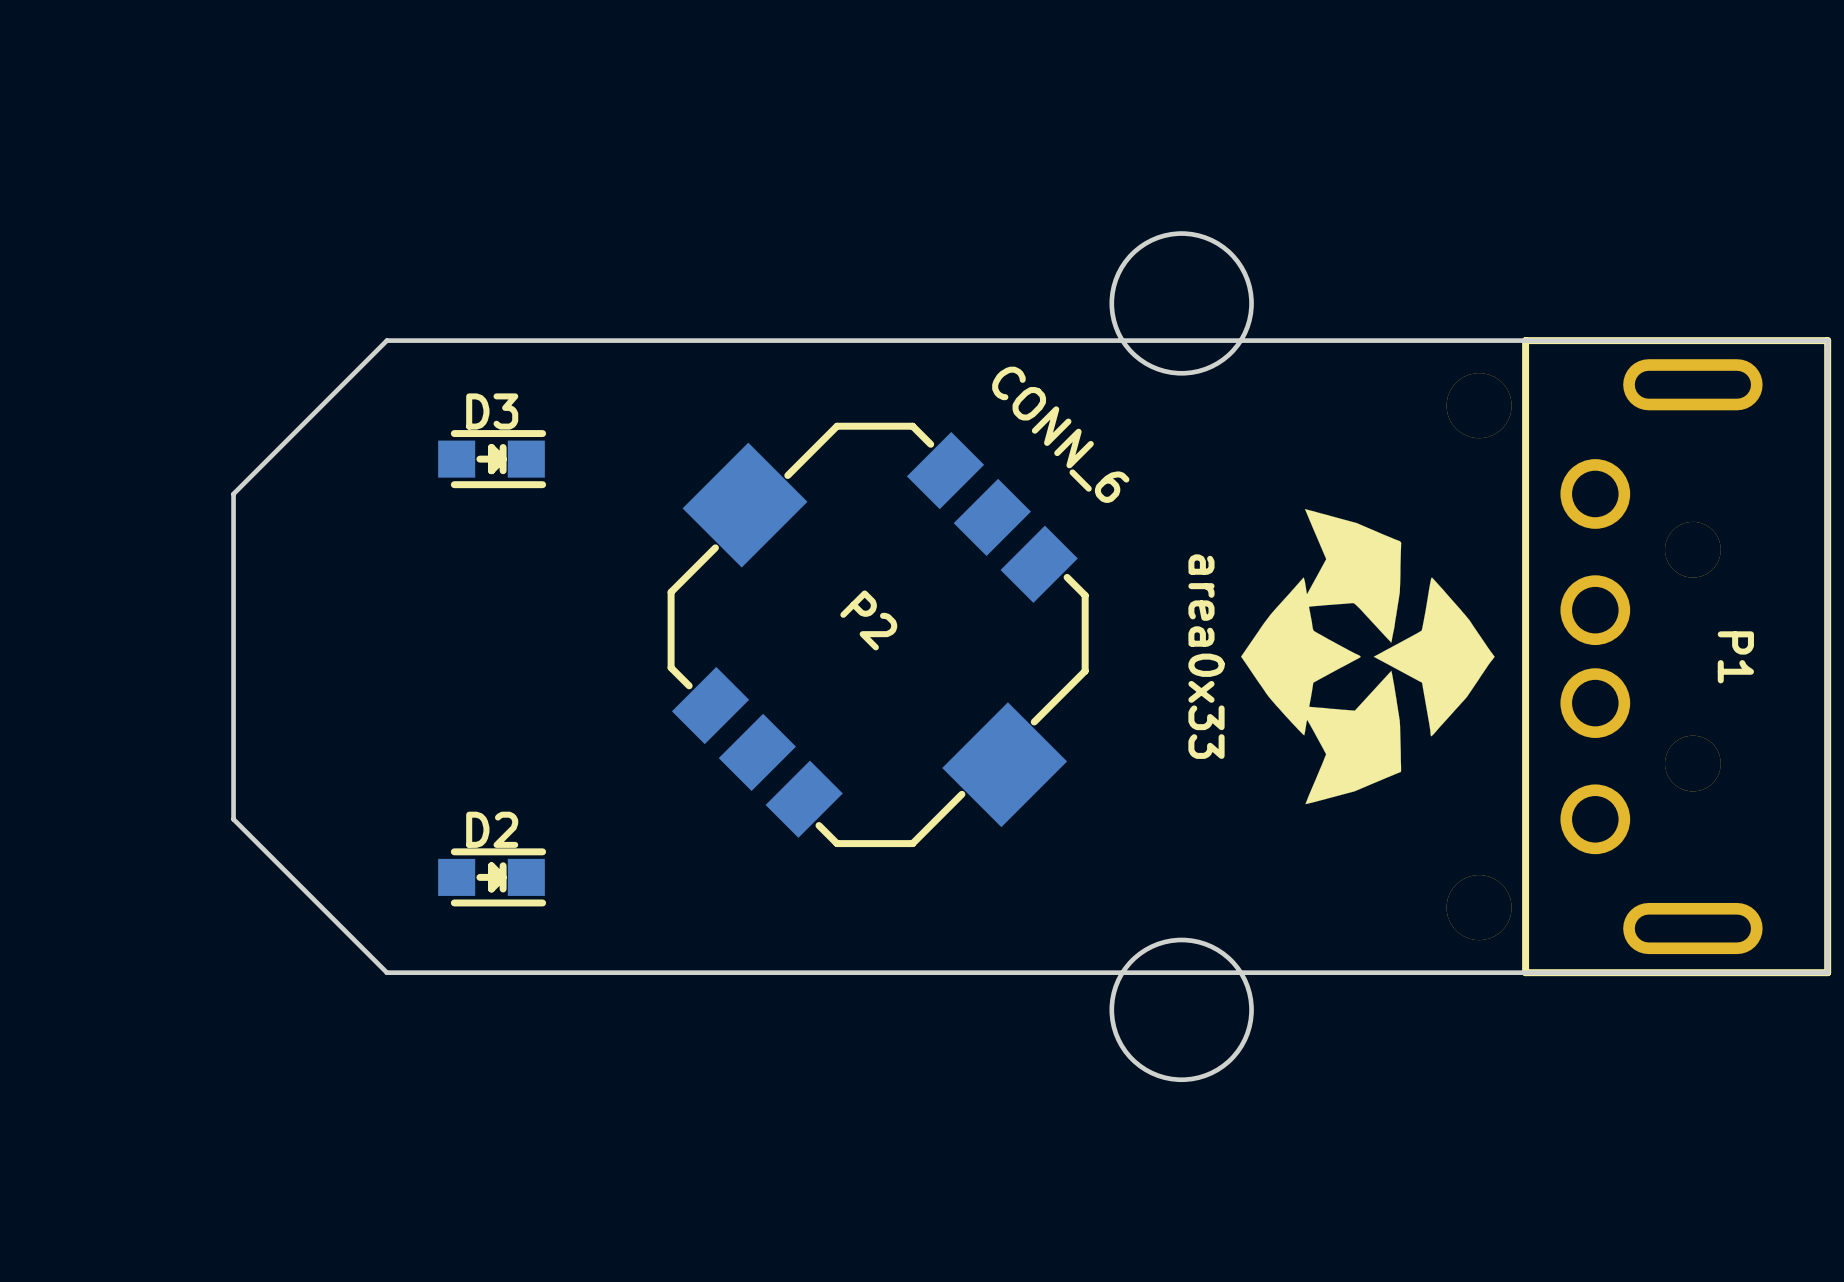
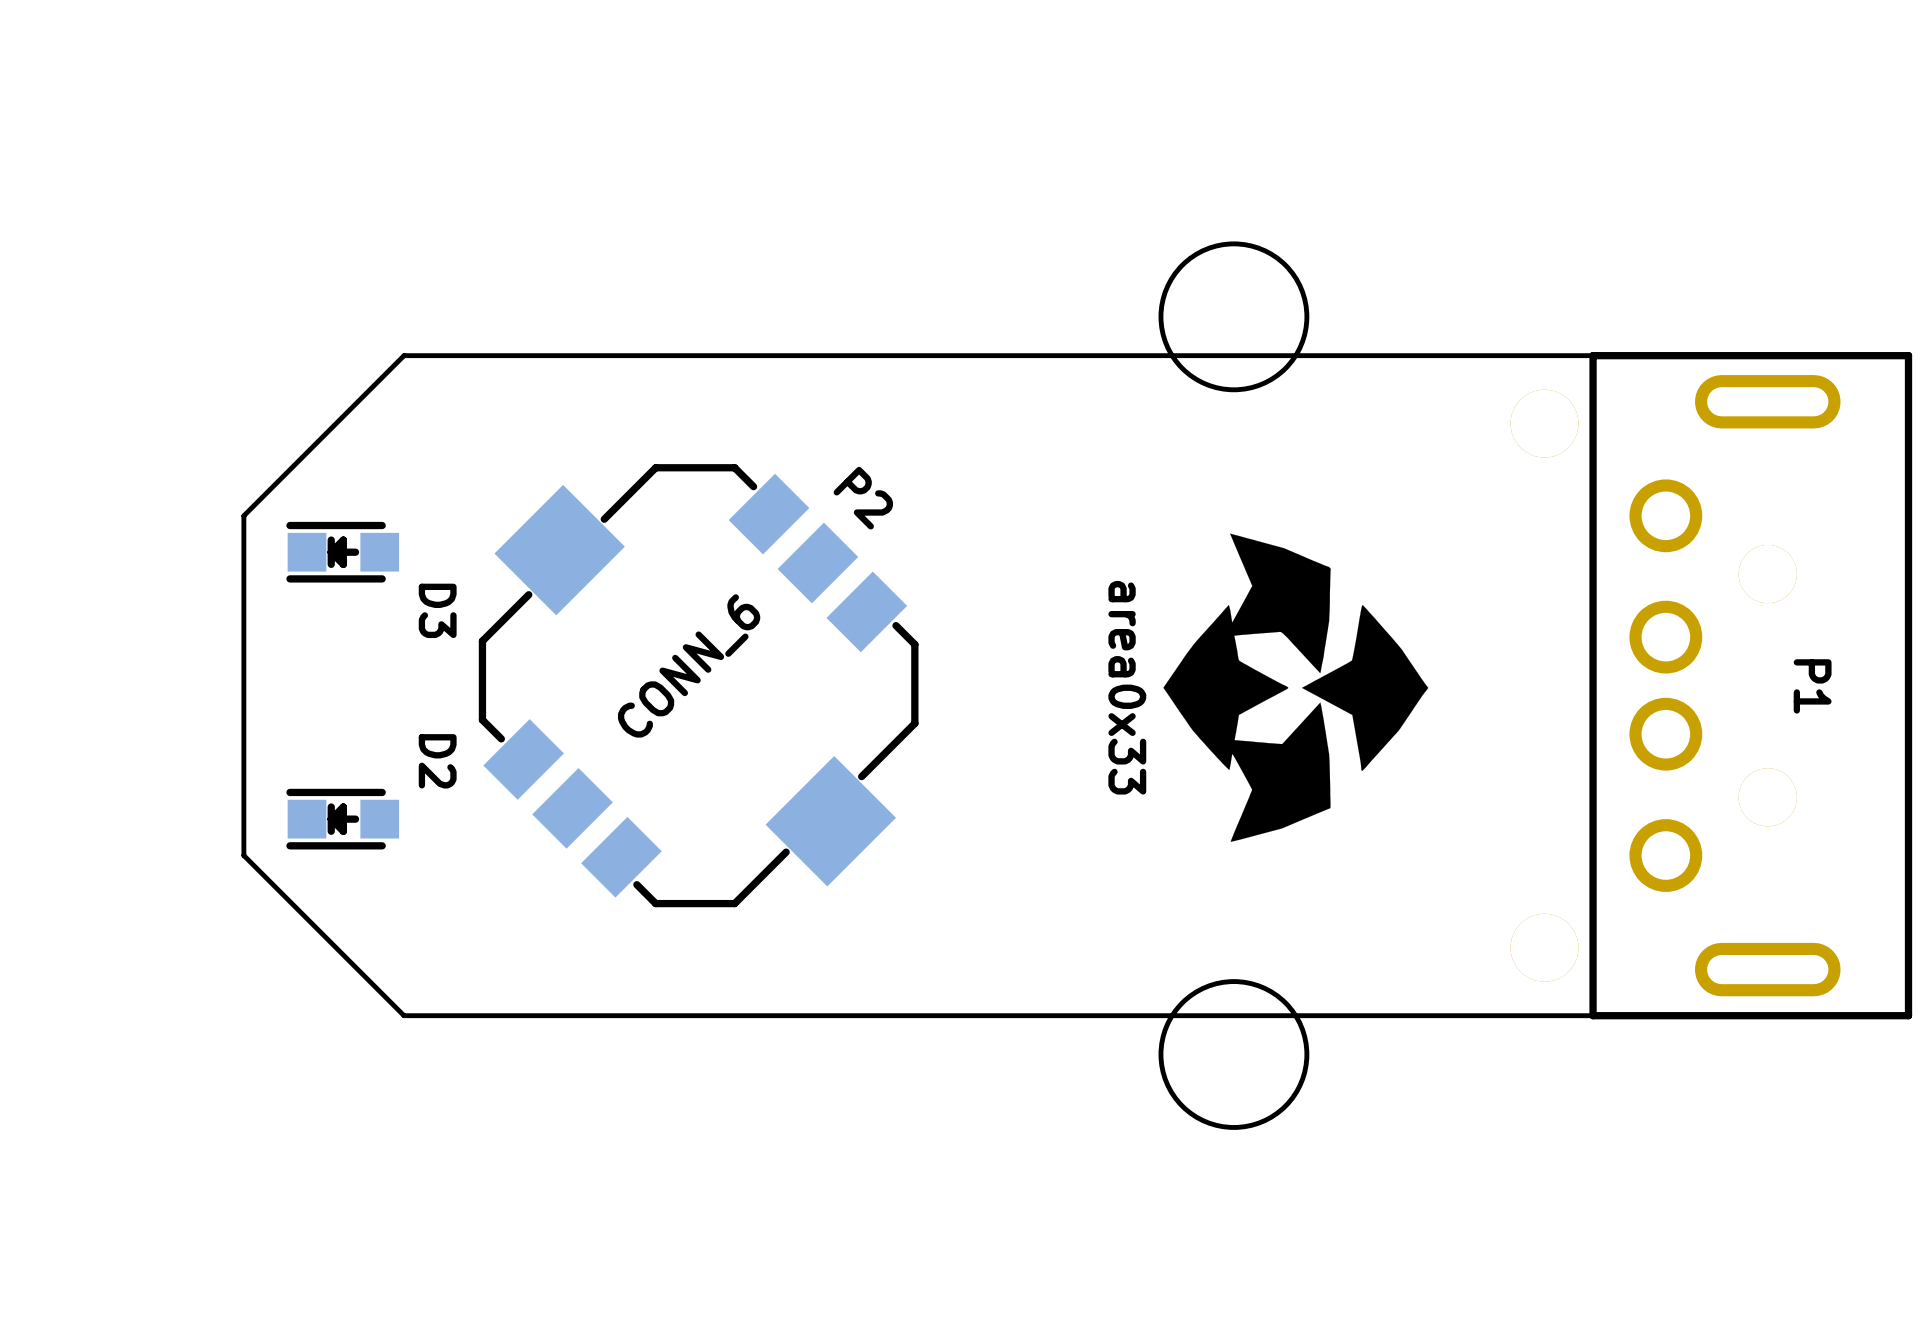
P2 value rotation: 0° (1060, 434) -> 90° counterclockwise (689, 665)
P2 value position: CONN_6 (1060, 434) -> CONN_6 (689, 665)
D3 rotation: 0° (492, 459) -> 180° (342, 552)
D3 position: (492, 459) -> (342, 552)
P2 name position: P2 (868, 620) -> P2 (863, 498)
P2 position: (878, 634) -> (698, 685)
area0x33 position: (1367, 656) -> (1295, 687)
D2 rotation: 0° (492, 877) -> 180° (342, 819)
D2 position: (492, 877) -> (342, 819)

